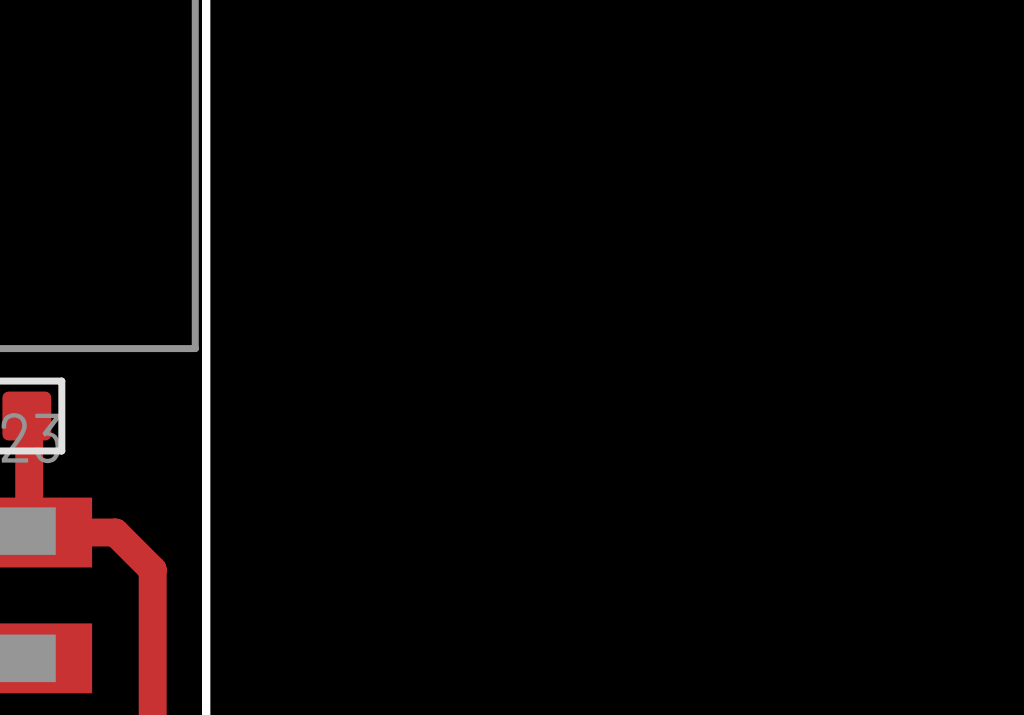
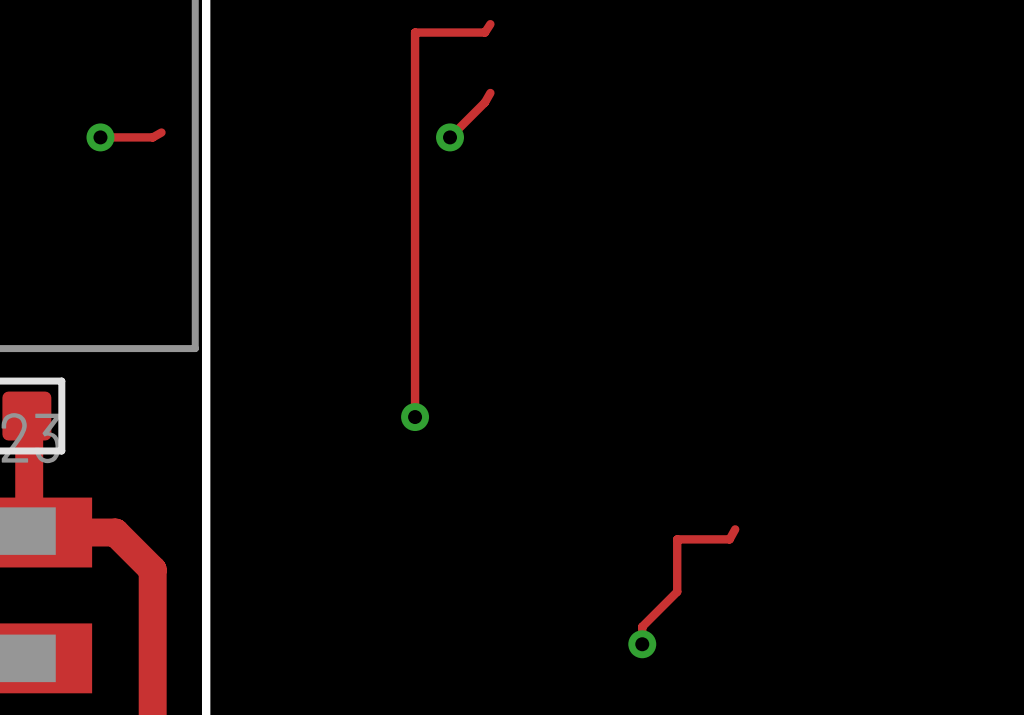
top track: none -> (490, 24) (484, 32) (415, 32) (415, 417)
top track: none -> (490, 92) (484, 102) (450, 137)
top track: none -> (161, 132) (152, 137) (100, 137)
via: none -> (100, 137)
via: none -> (450, 137)
via: none -> (415, 417)
top track: none -> (735, 529) (729, 539) (677, 539) (677, 591) (642, 626) (642, 644)
via: none -> (642, 644)

